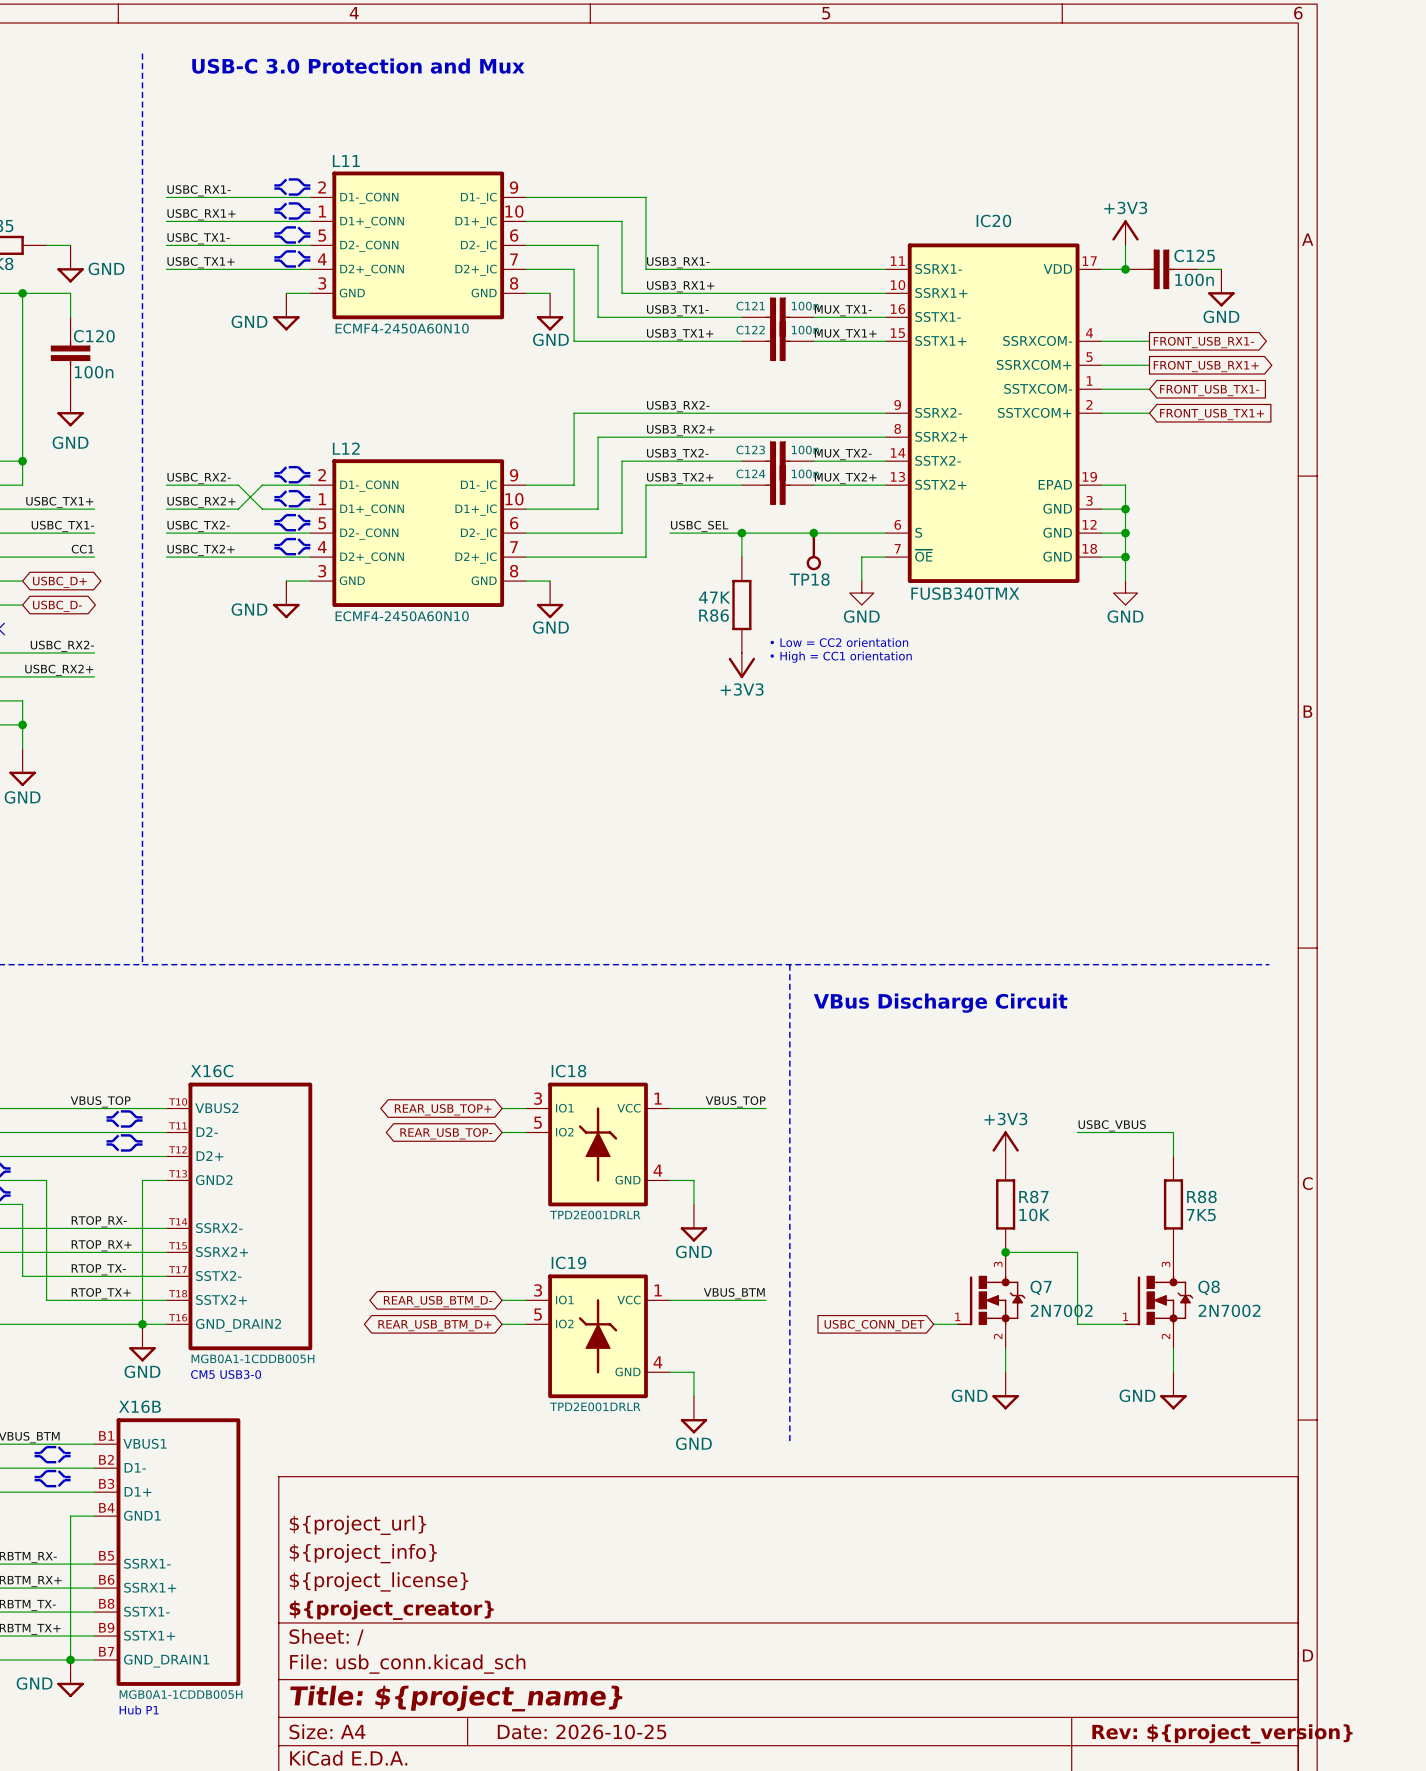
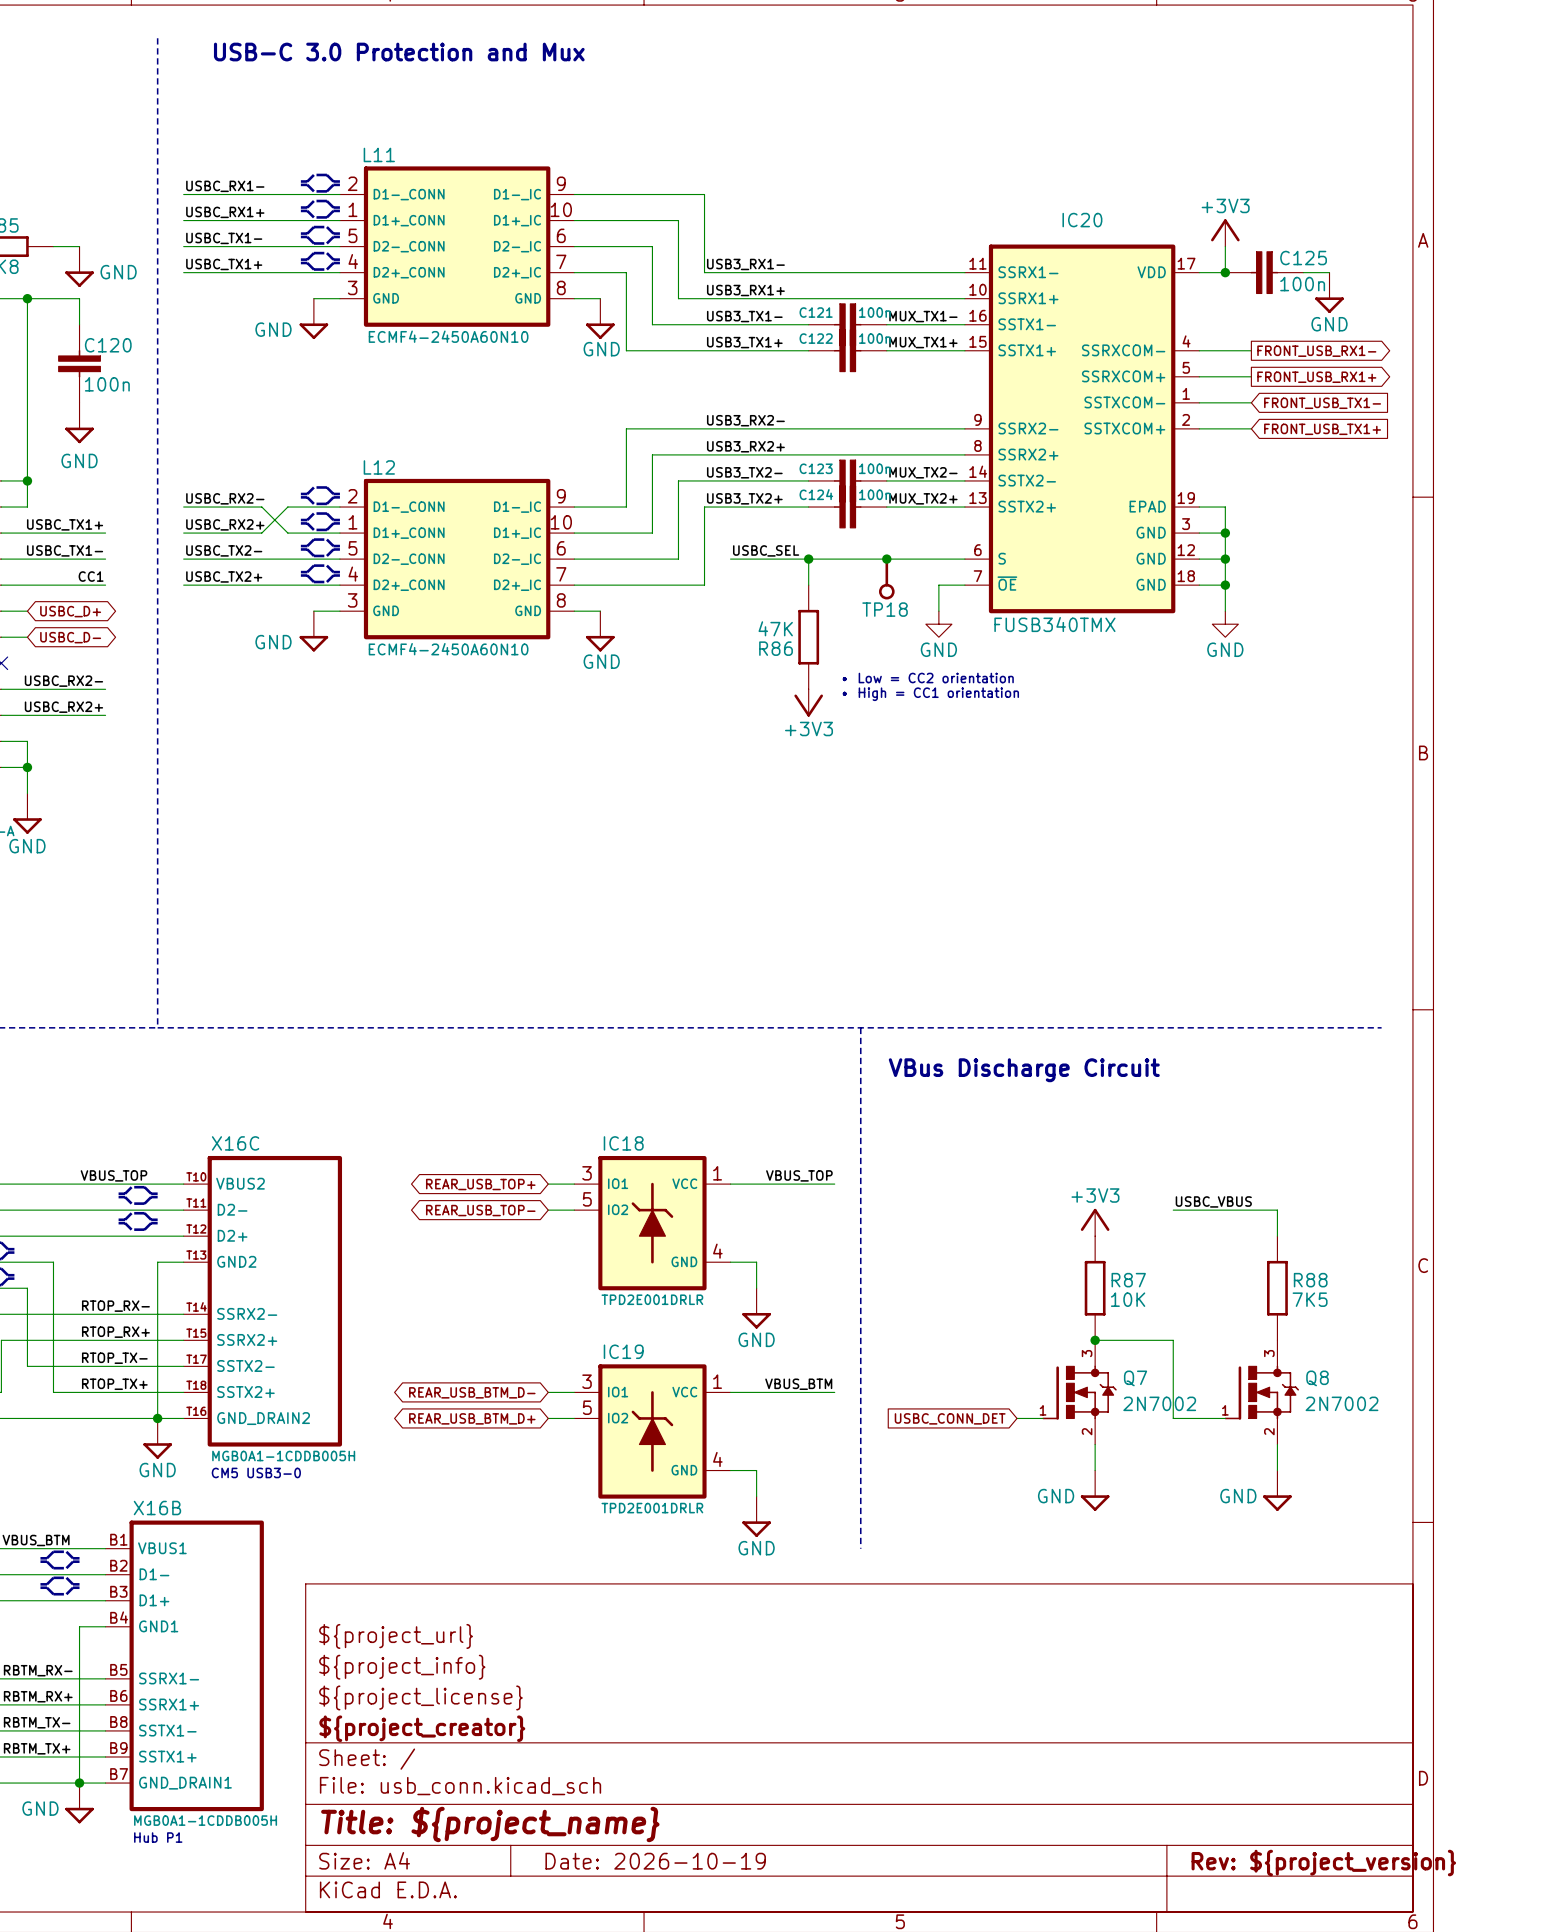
title block: Date: 2026-10-25 (582, 1731) -> Date: 2026-10-19 (655, 1861)

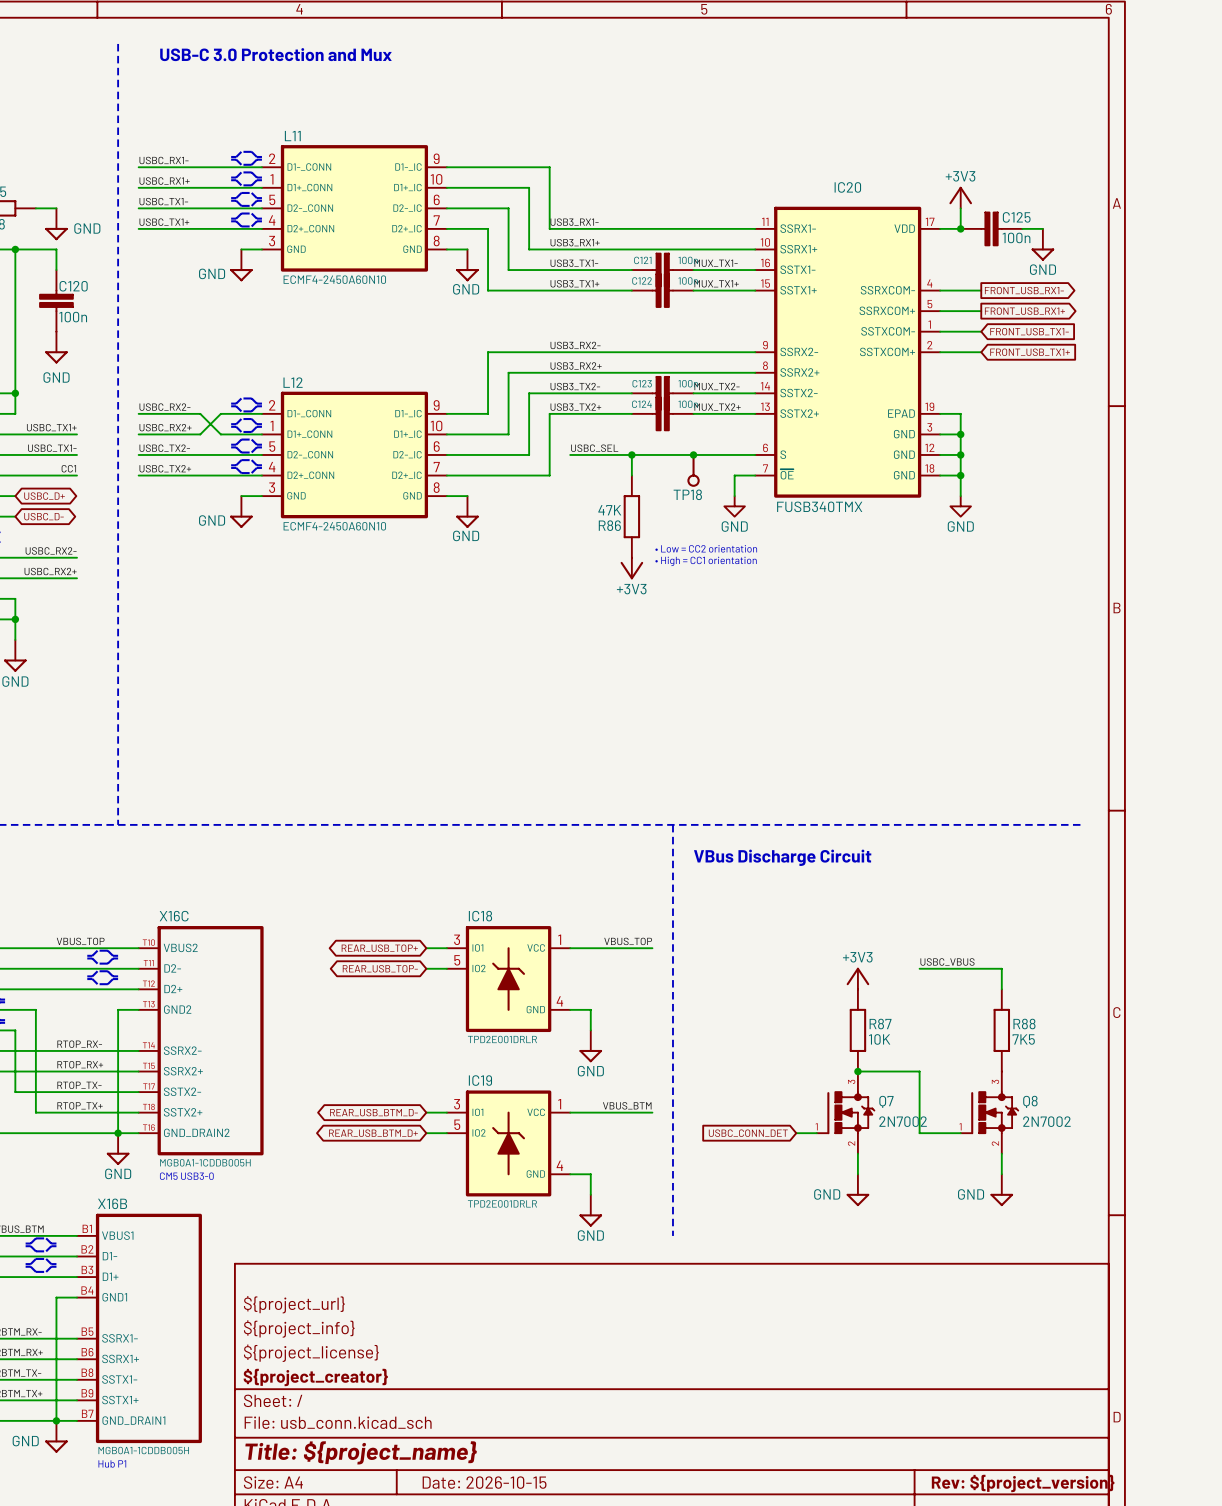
title block: Date: 2026-10-19 (655, 1861) -> Date: 2026-10-15 (484, 1482)

